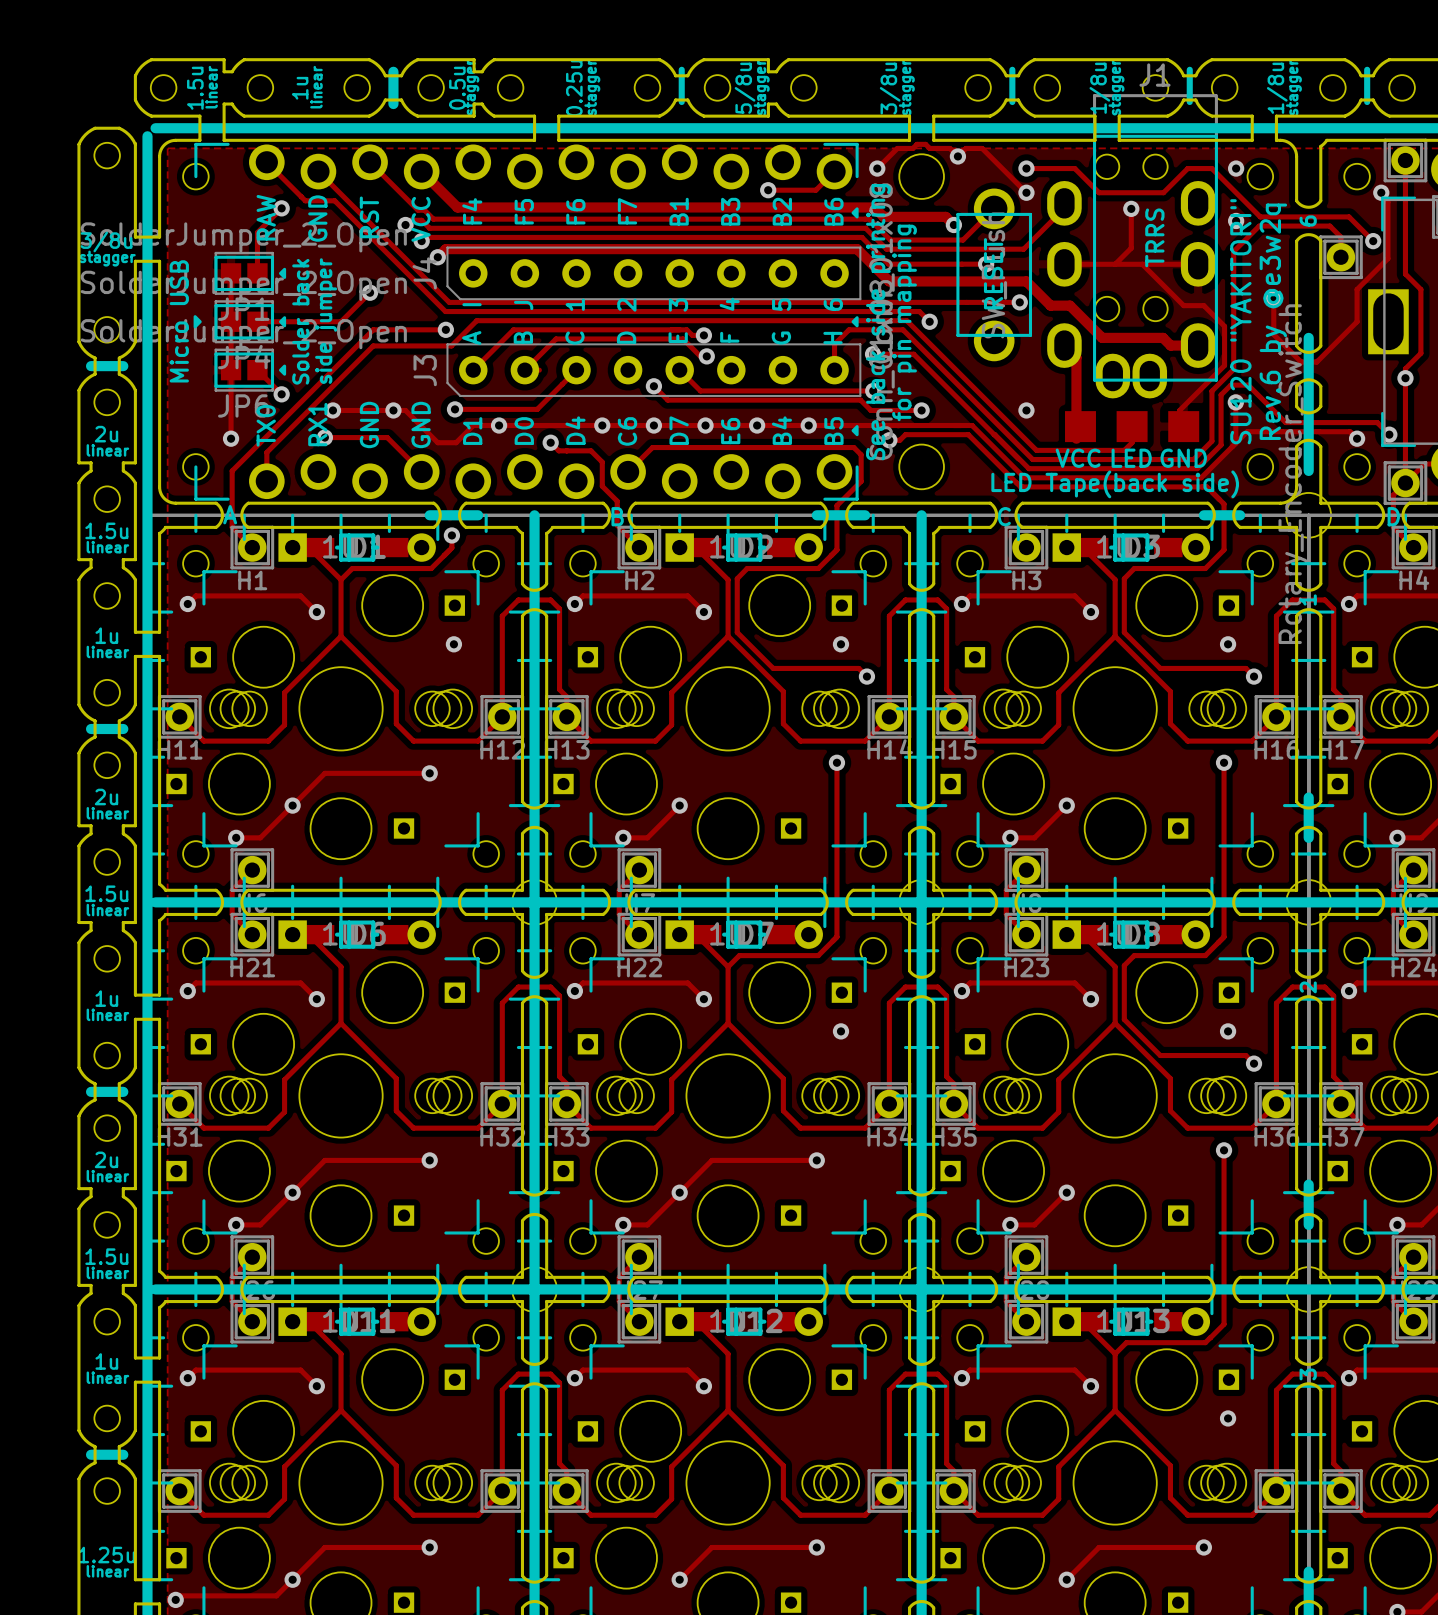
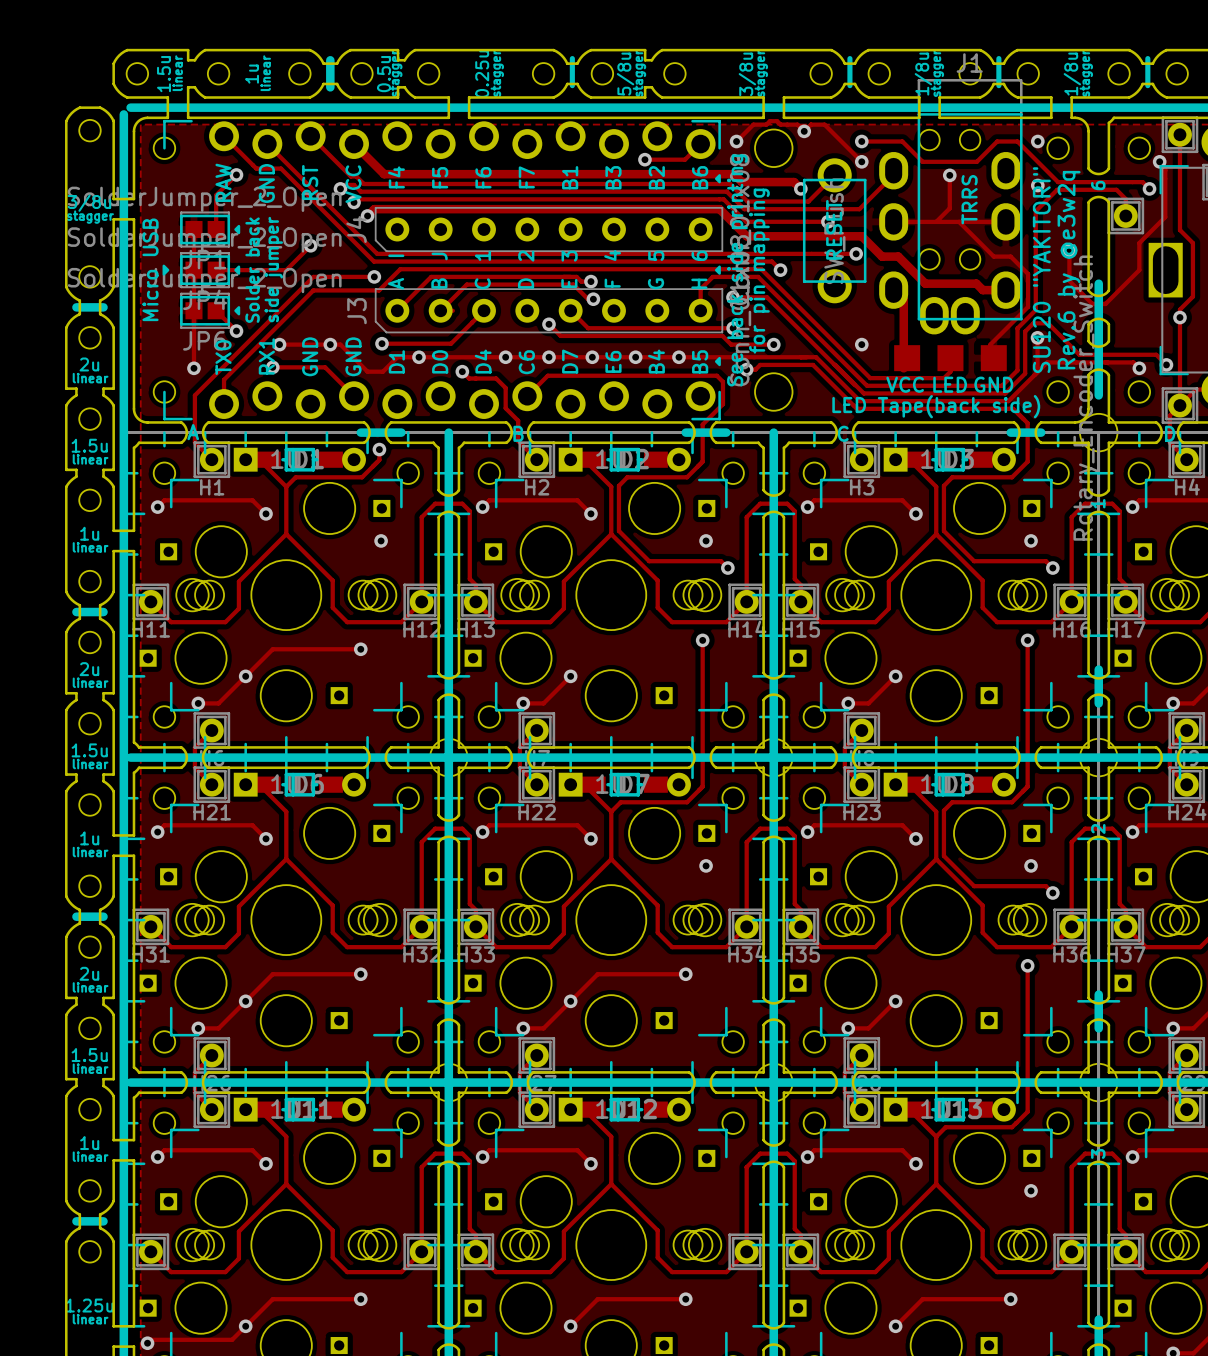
track: (1349, 216) (1373, 241) -> (1132, 182) (1142, 182) (1149, 188)
via position: (1373, 241) -> (1149, 188)

